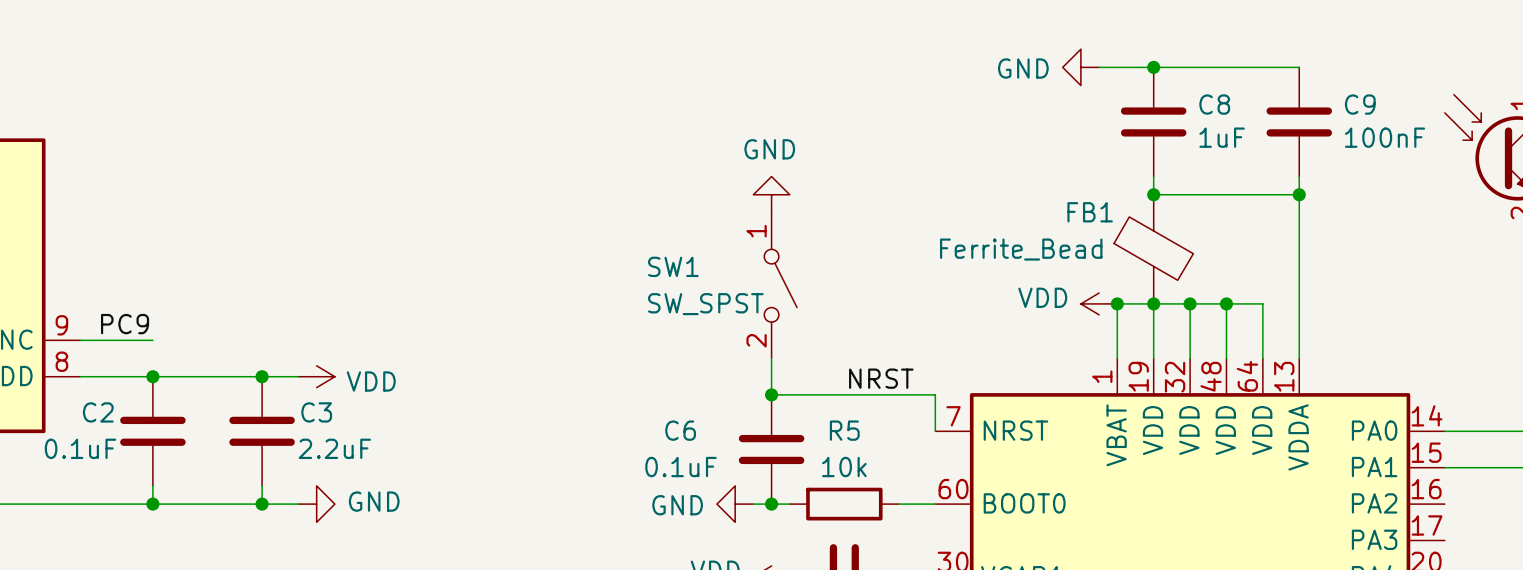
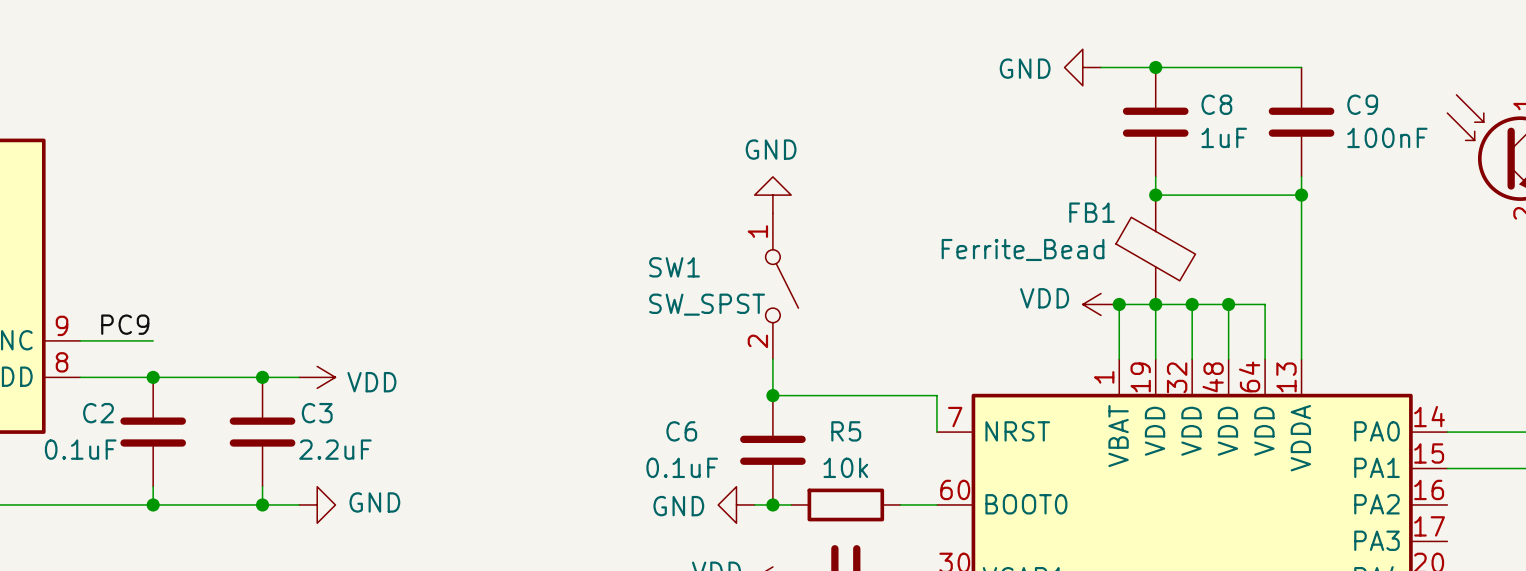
label: NRST (881, 378) -> none

